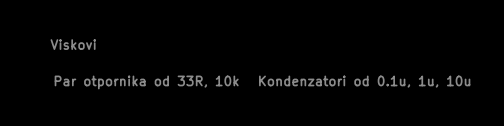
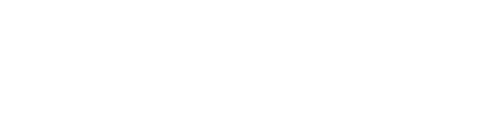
text: Viskovi (73, 44) -> none
text: Kondenzatori od 0.1u, 1u, 10u (364, 81) -> none
text: Par otpornika od 33R, 10k (146, 82) -> none

